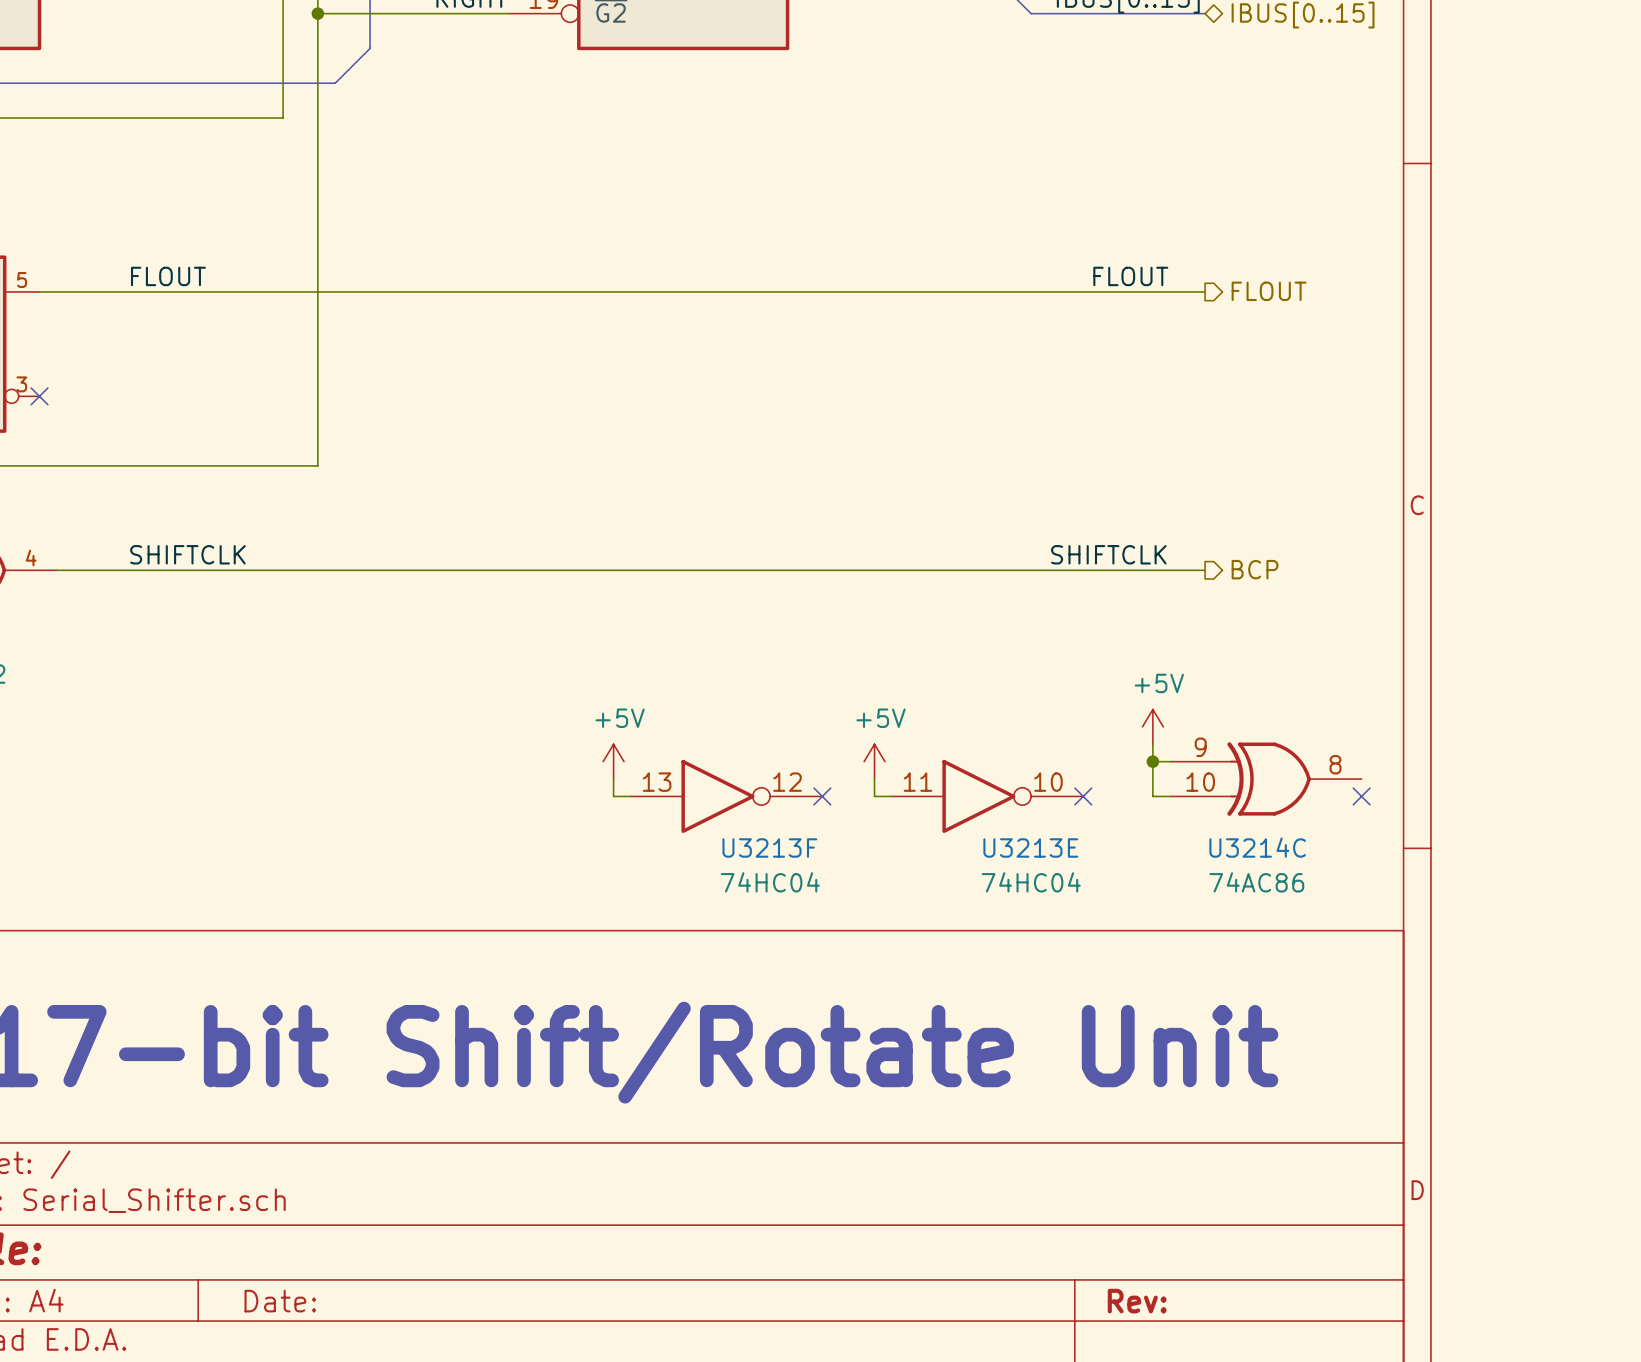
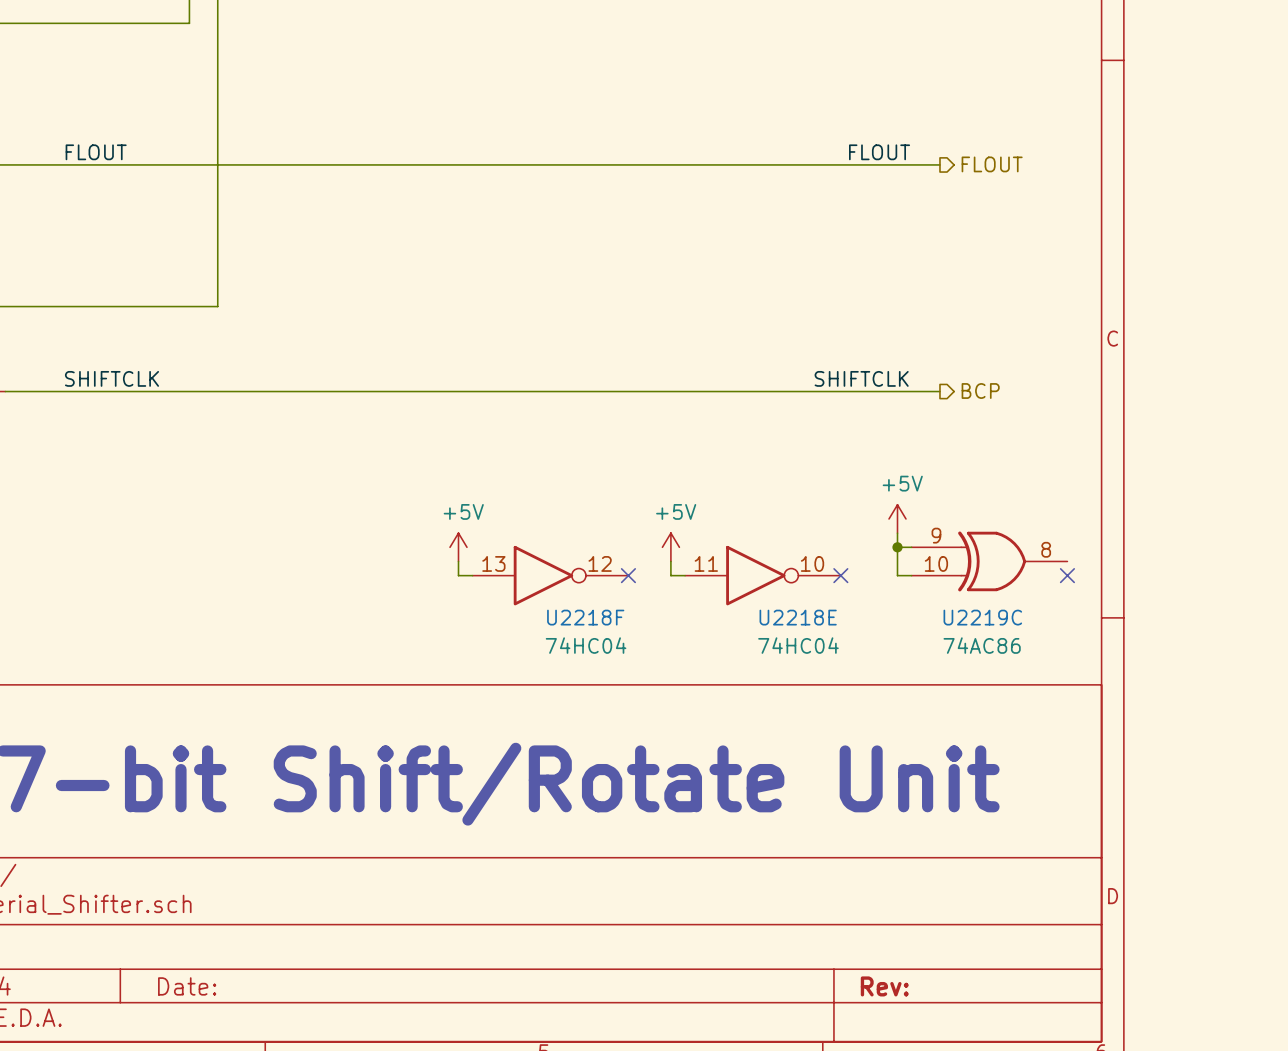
U3213F name: U3213F (769, 847) -> U2218F (585, 617)
U3213E name: U3213E (1030, 847) -> U2218E (798, 617)
U3214C name: U3214C (1257, 847) -> U2219C (982, 617)

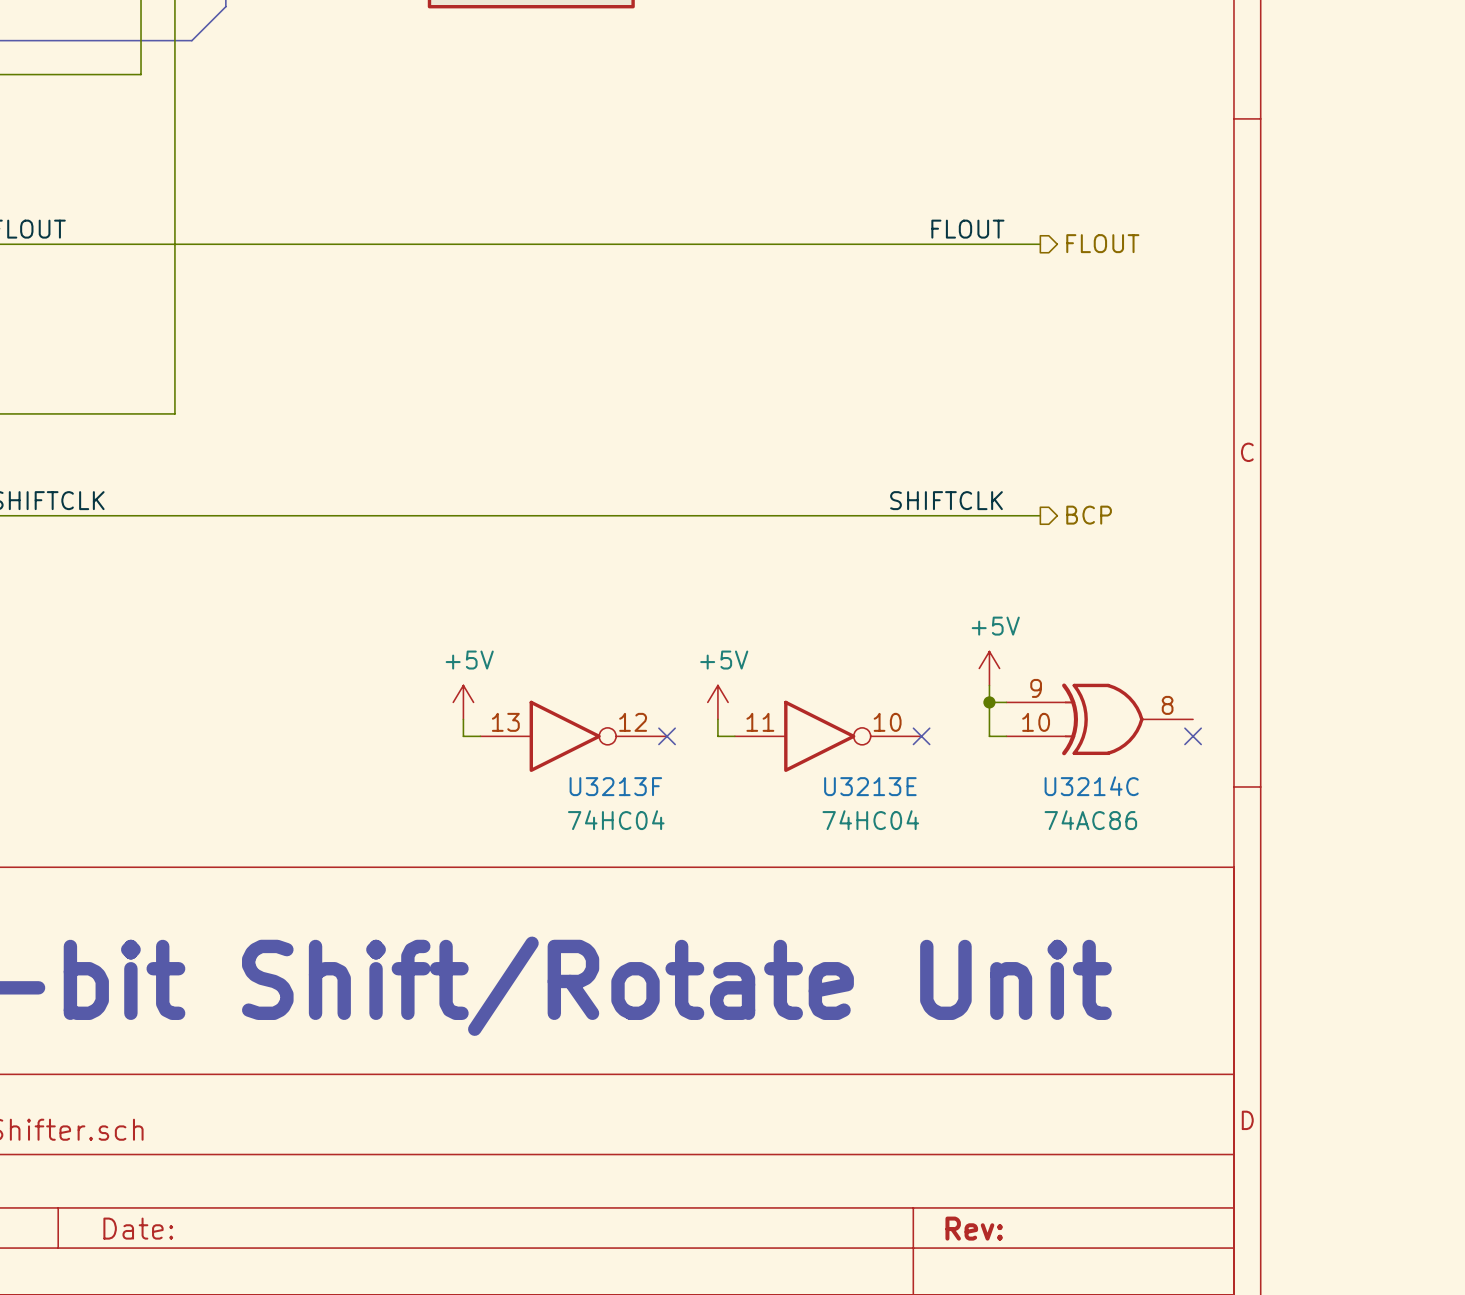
U2218F name: U2218F (585, 617) -> U3213F (615, 786)
U2218E name: U2218E (798, 617) -> U3213E (870, 786)
U2219C name: U2219C (982, 617) -> U3214C (1091, 786)

